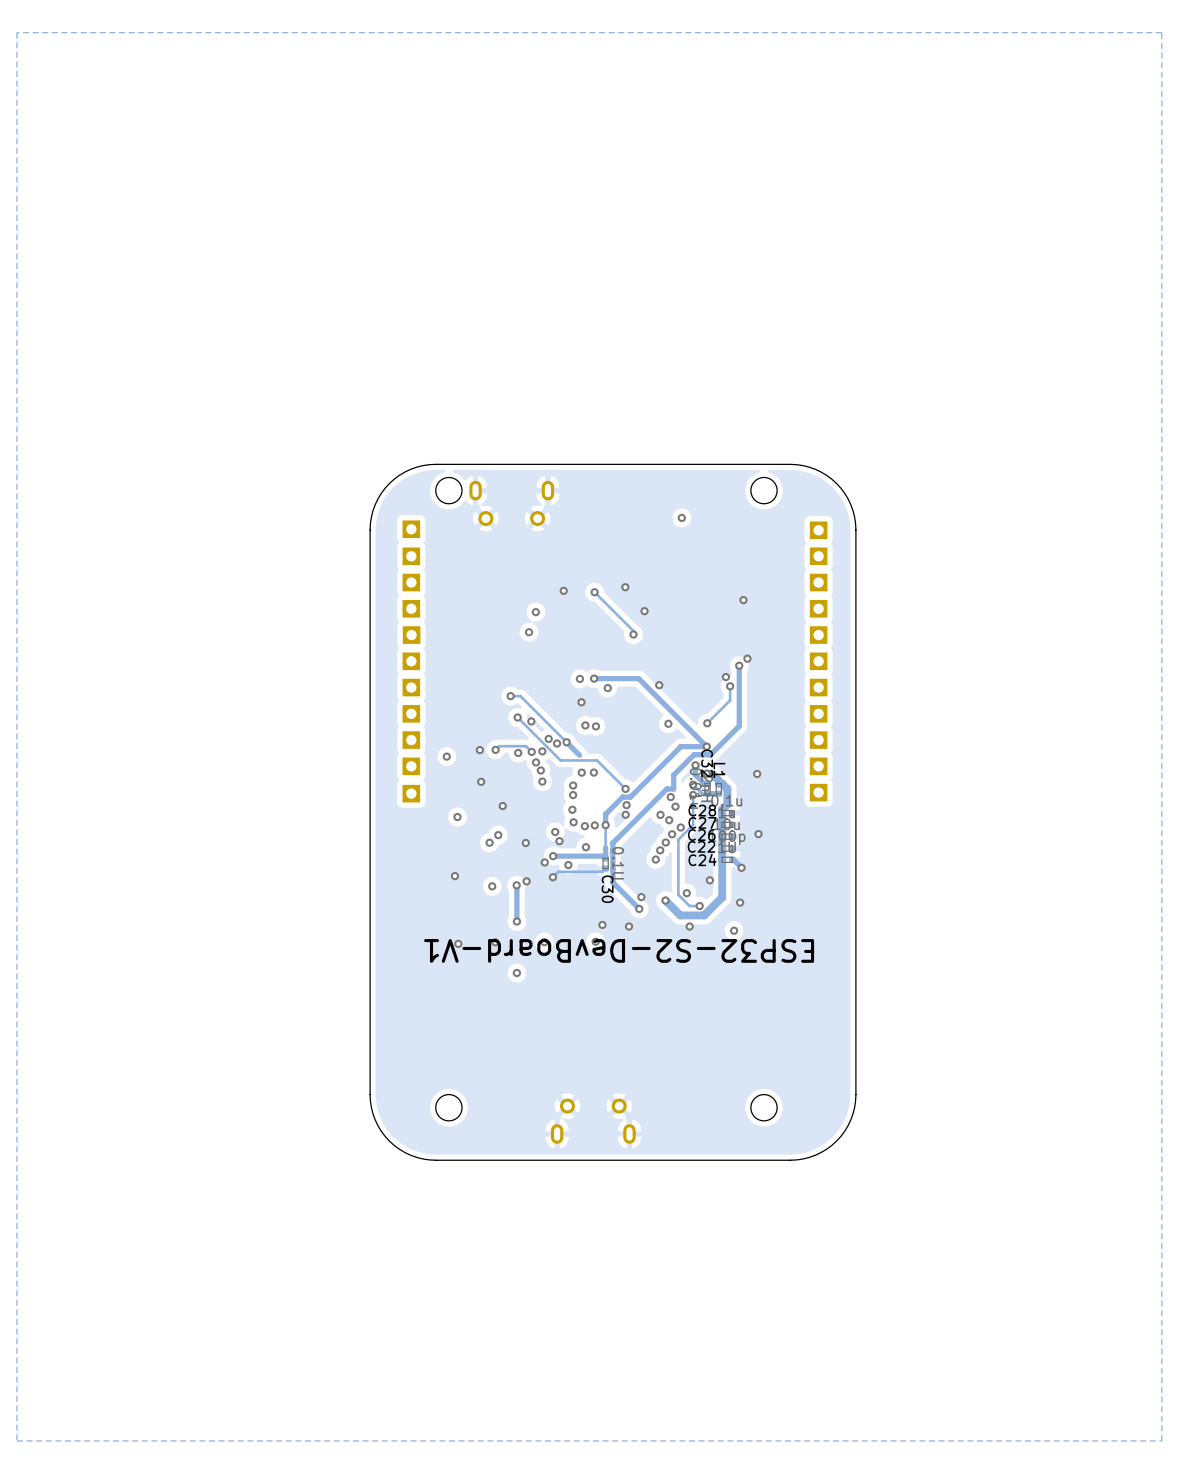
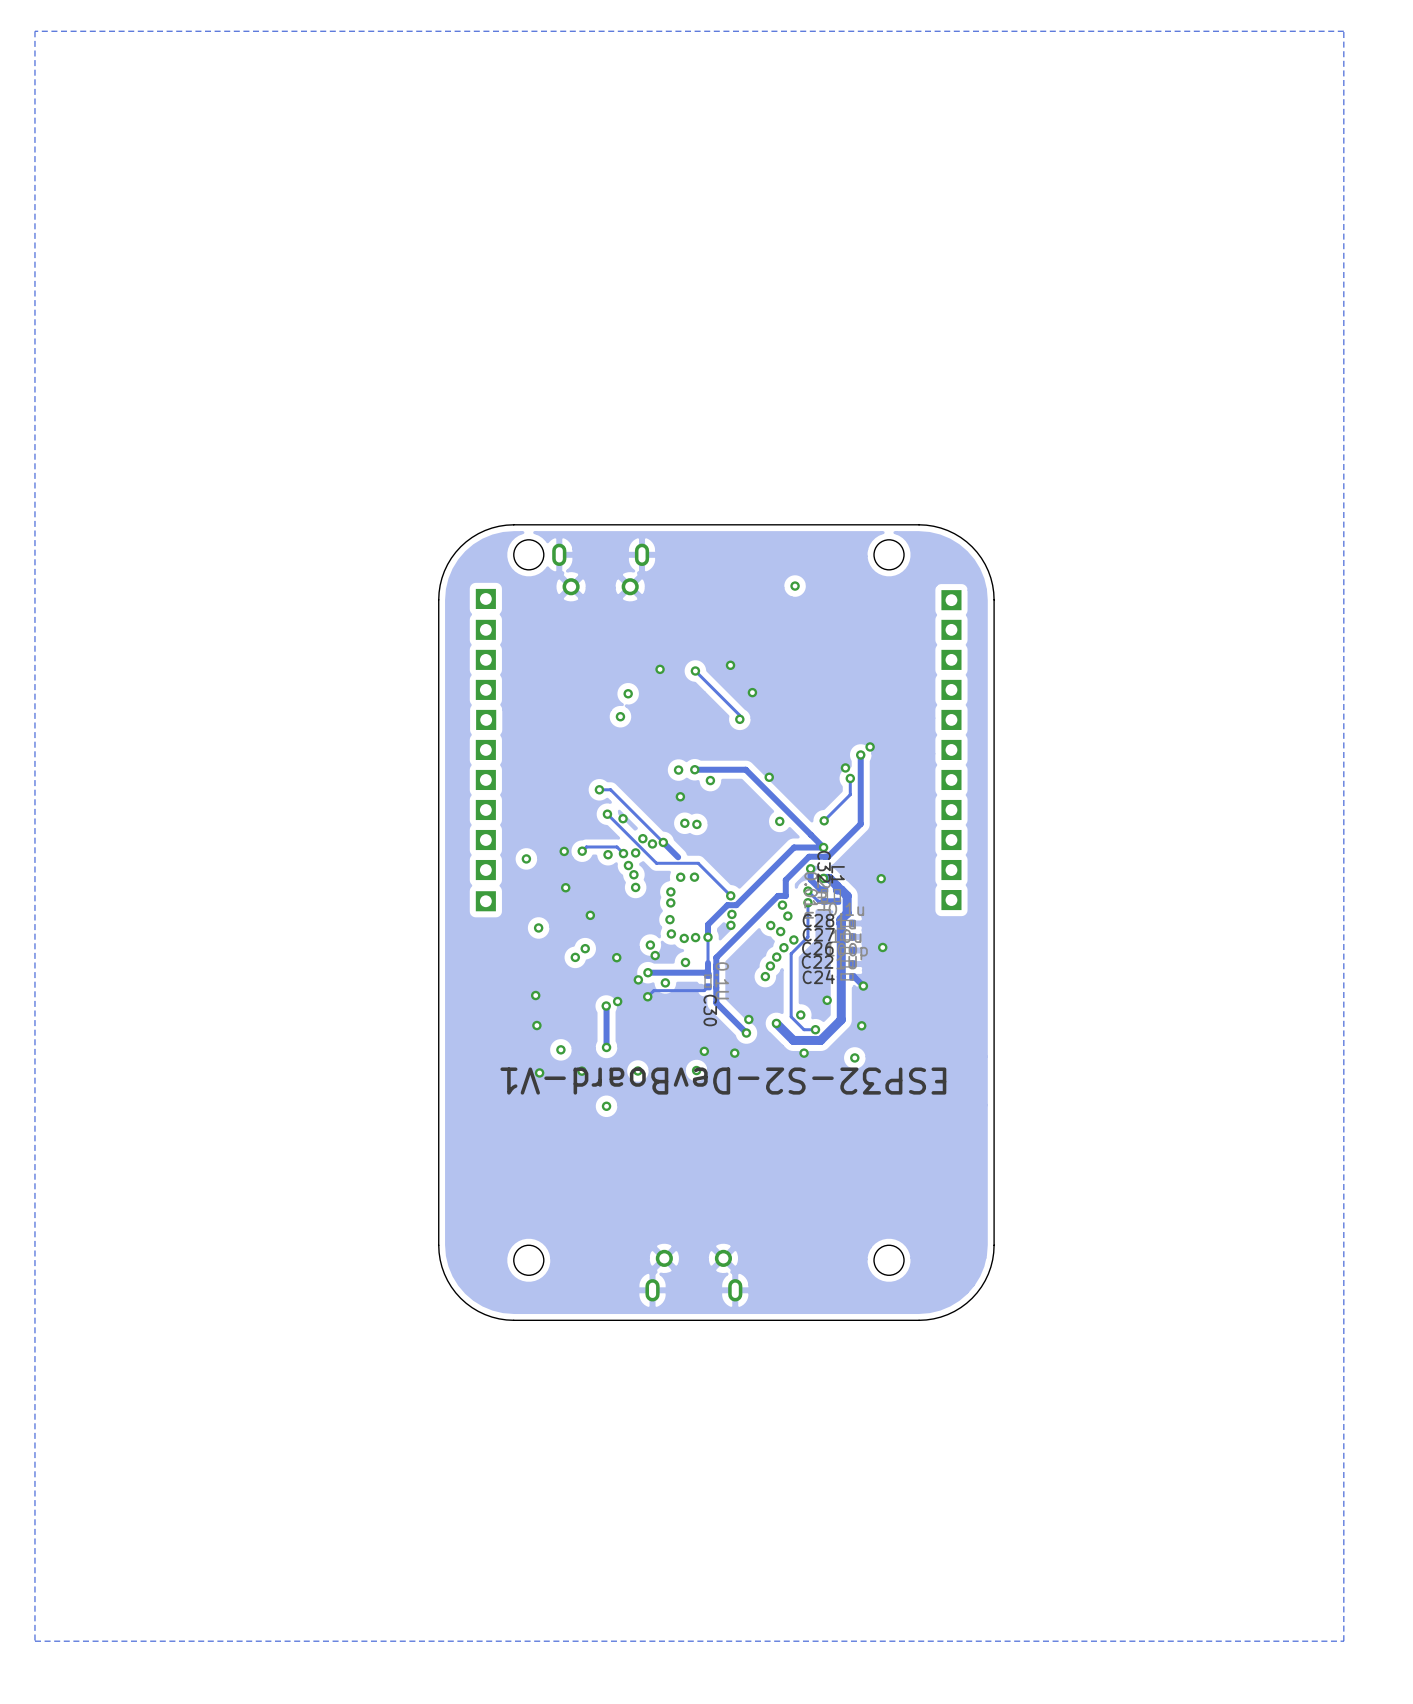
via: (743, 600) -> none
via: (492, 886) -> none
via: none -> (536, 1025)
via: none -> (560, 1049)

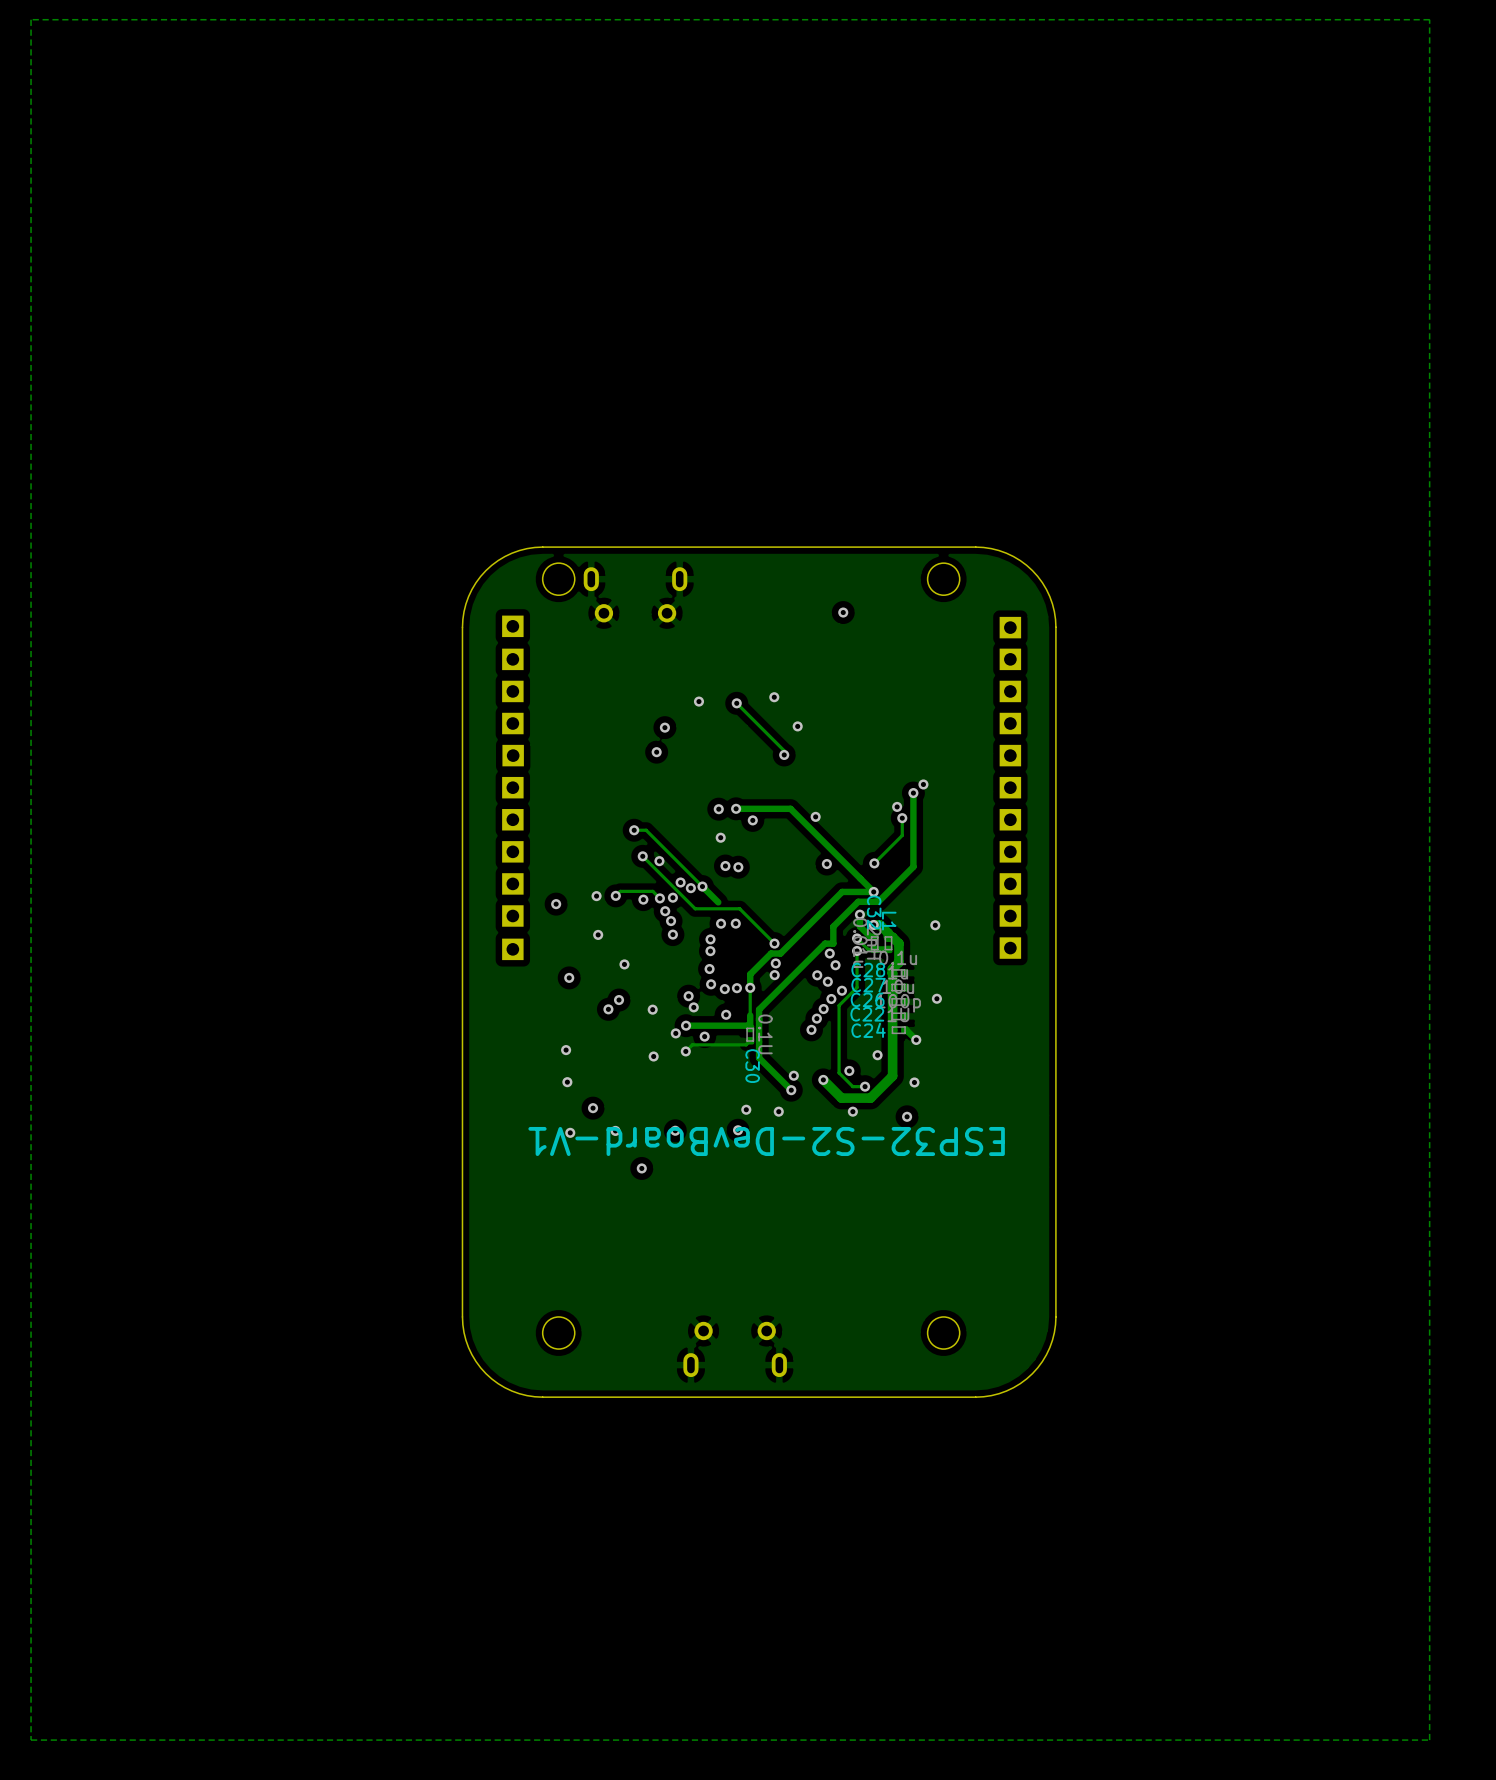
track: (606, 1006) (606, 1047) -> none
via: (606, 1006) -> none
via: (606, 1047) -> none

